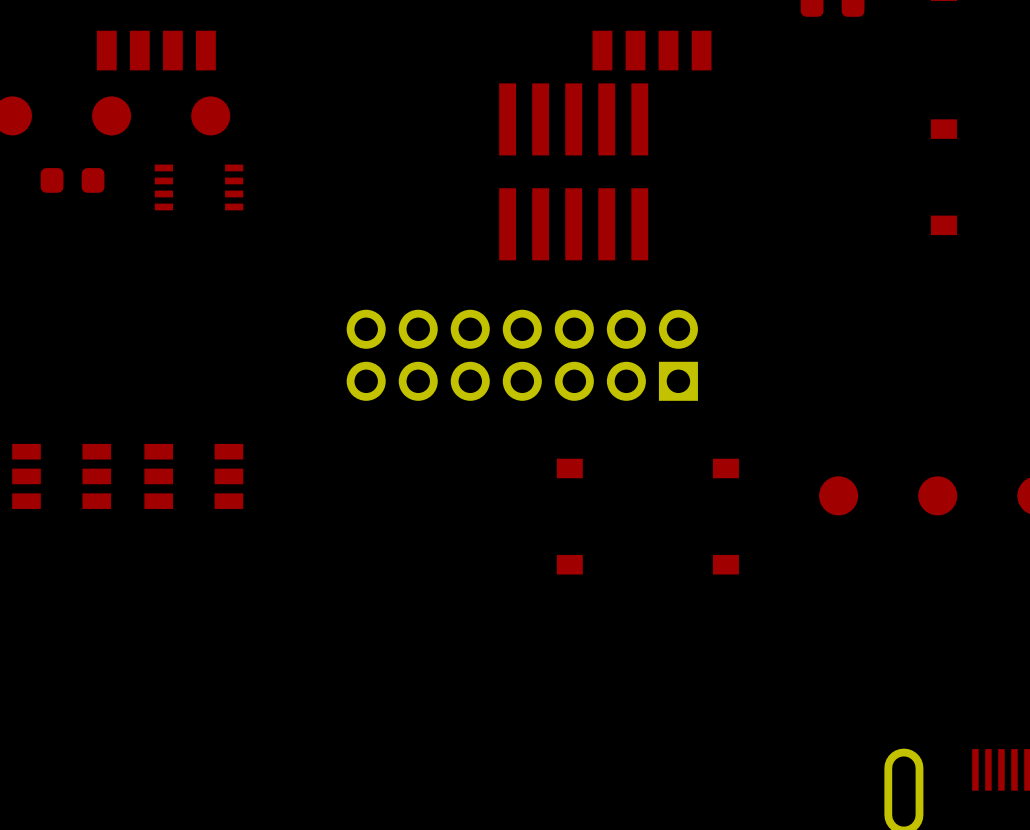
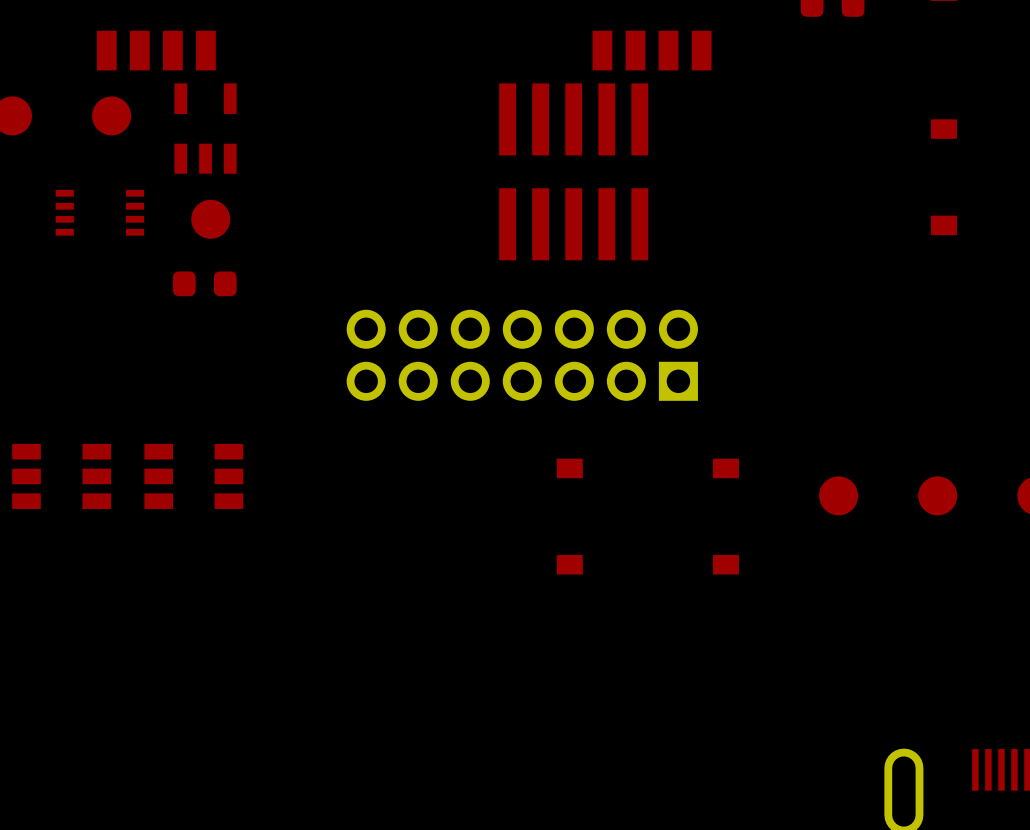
part footprint: [191, 96, 231, 136] -> [174, 83, 237, 174]
part position: (72, 180) -> (204, 283)
part position: (199, 187) -> (99, 212)
part: none -> (210, 219)

